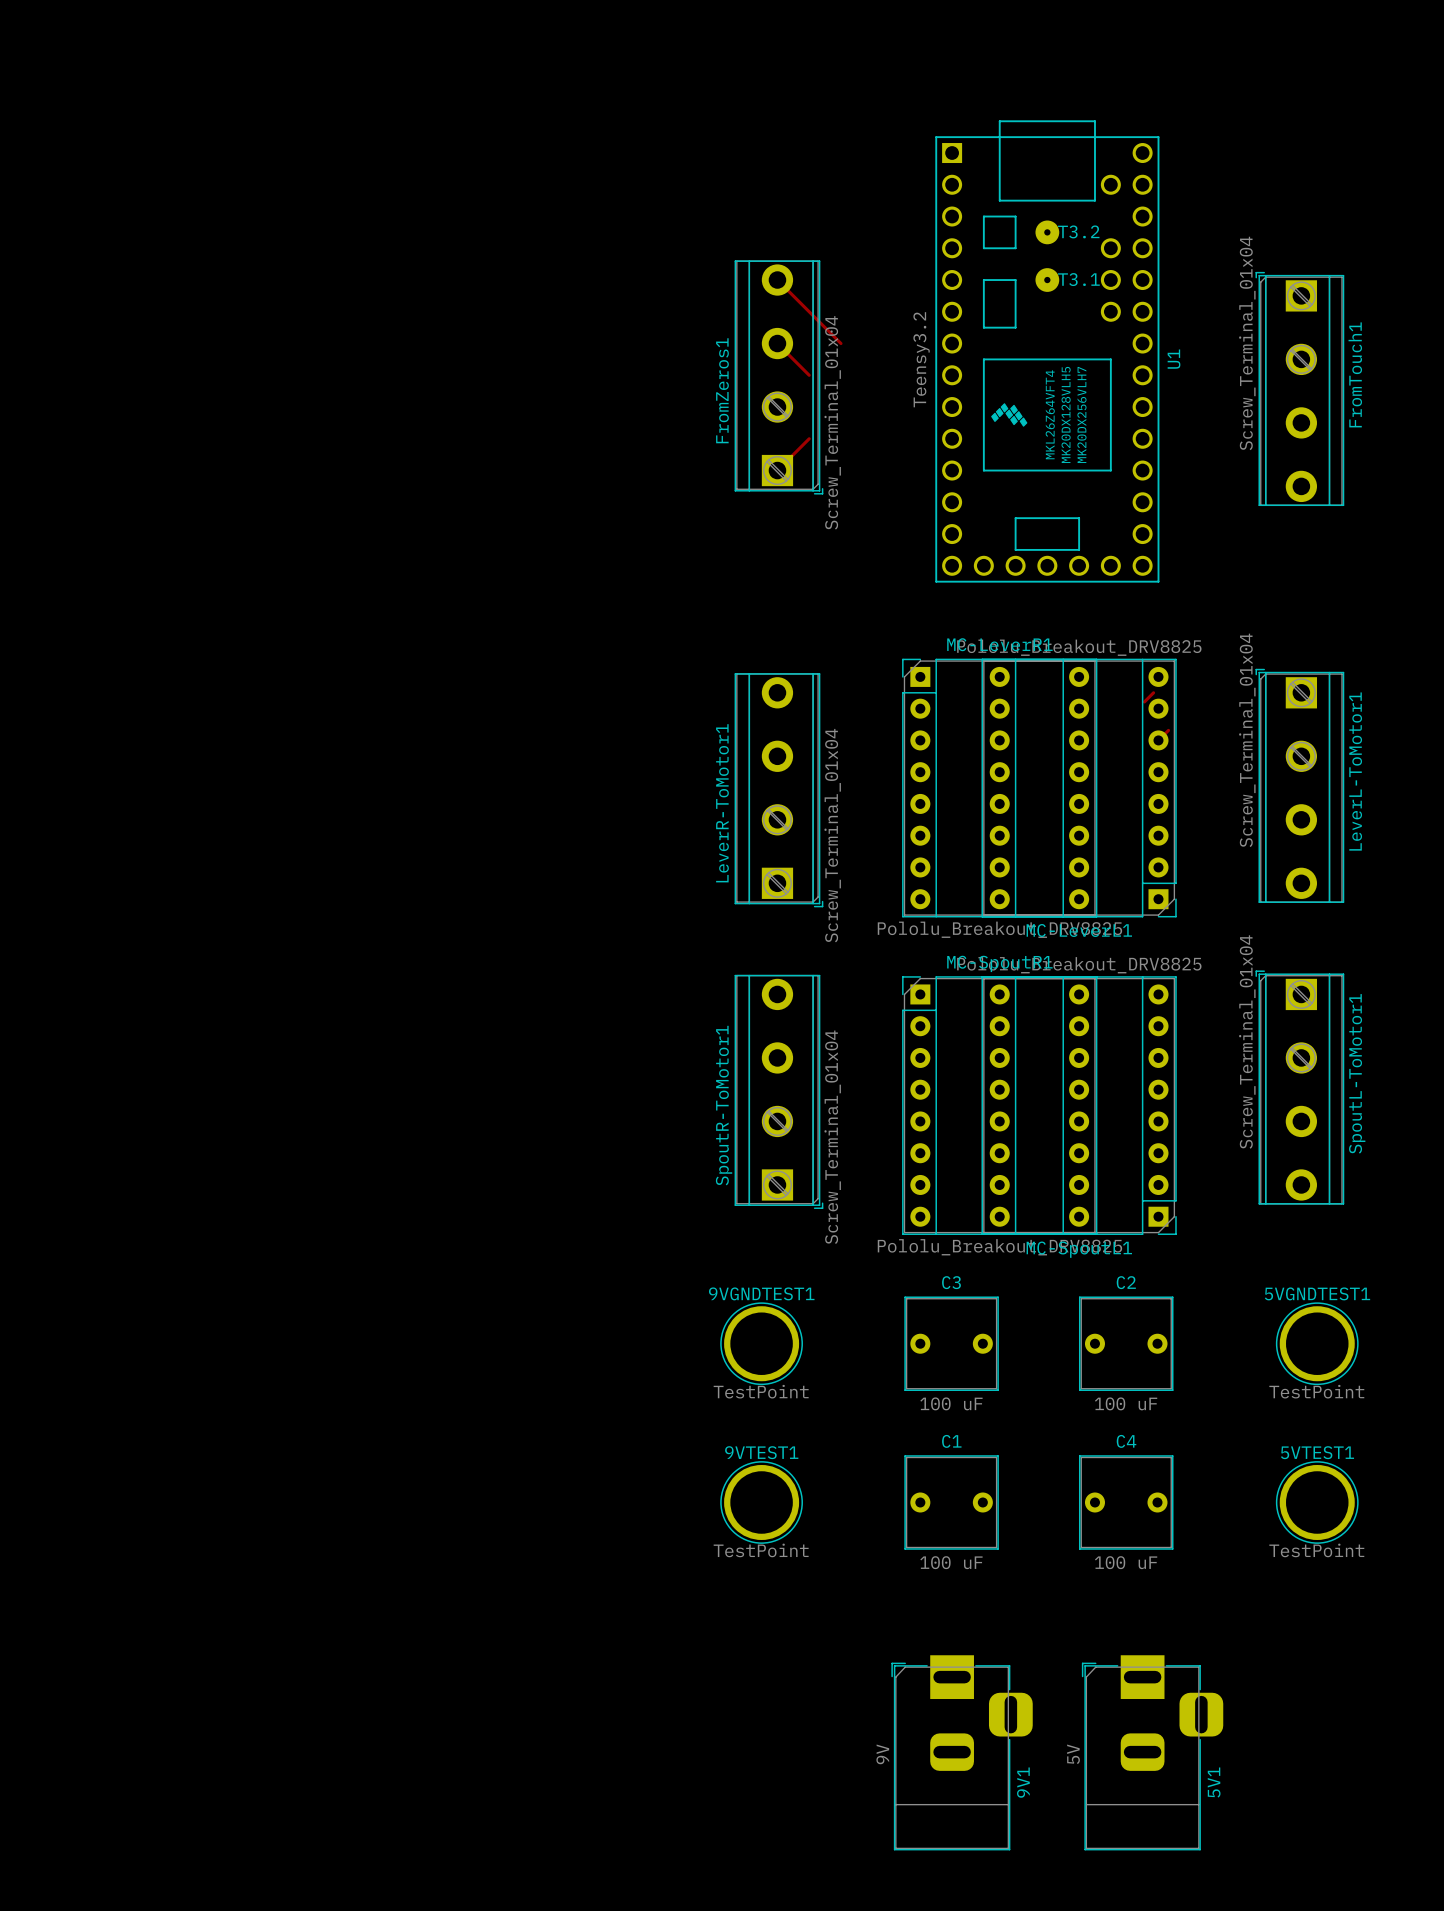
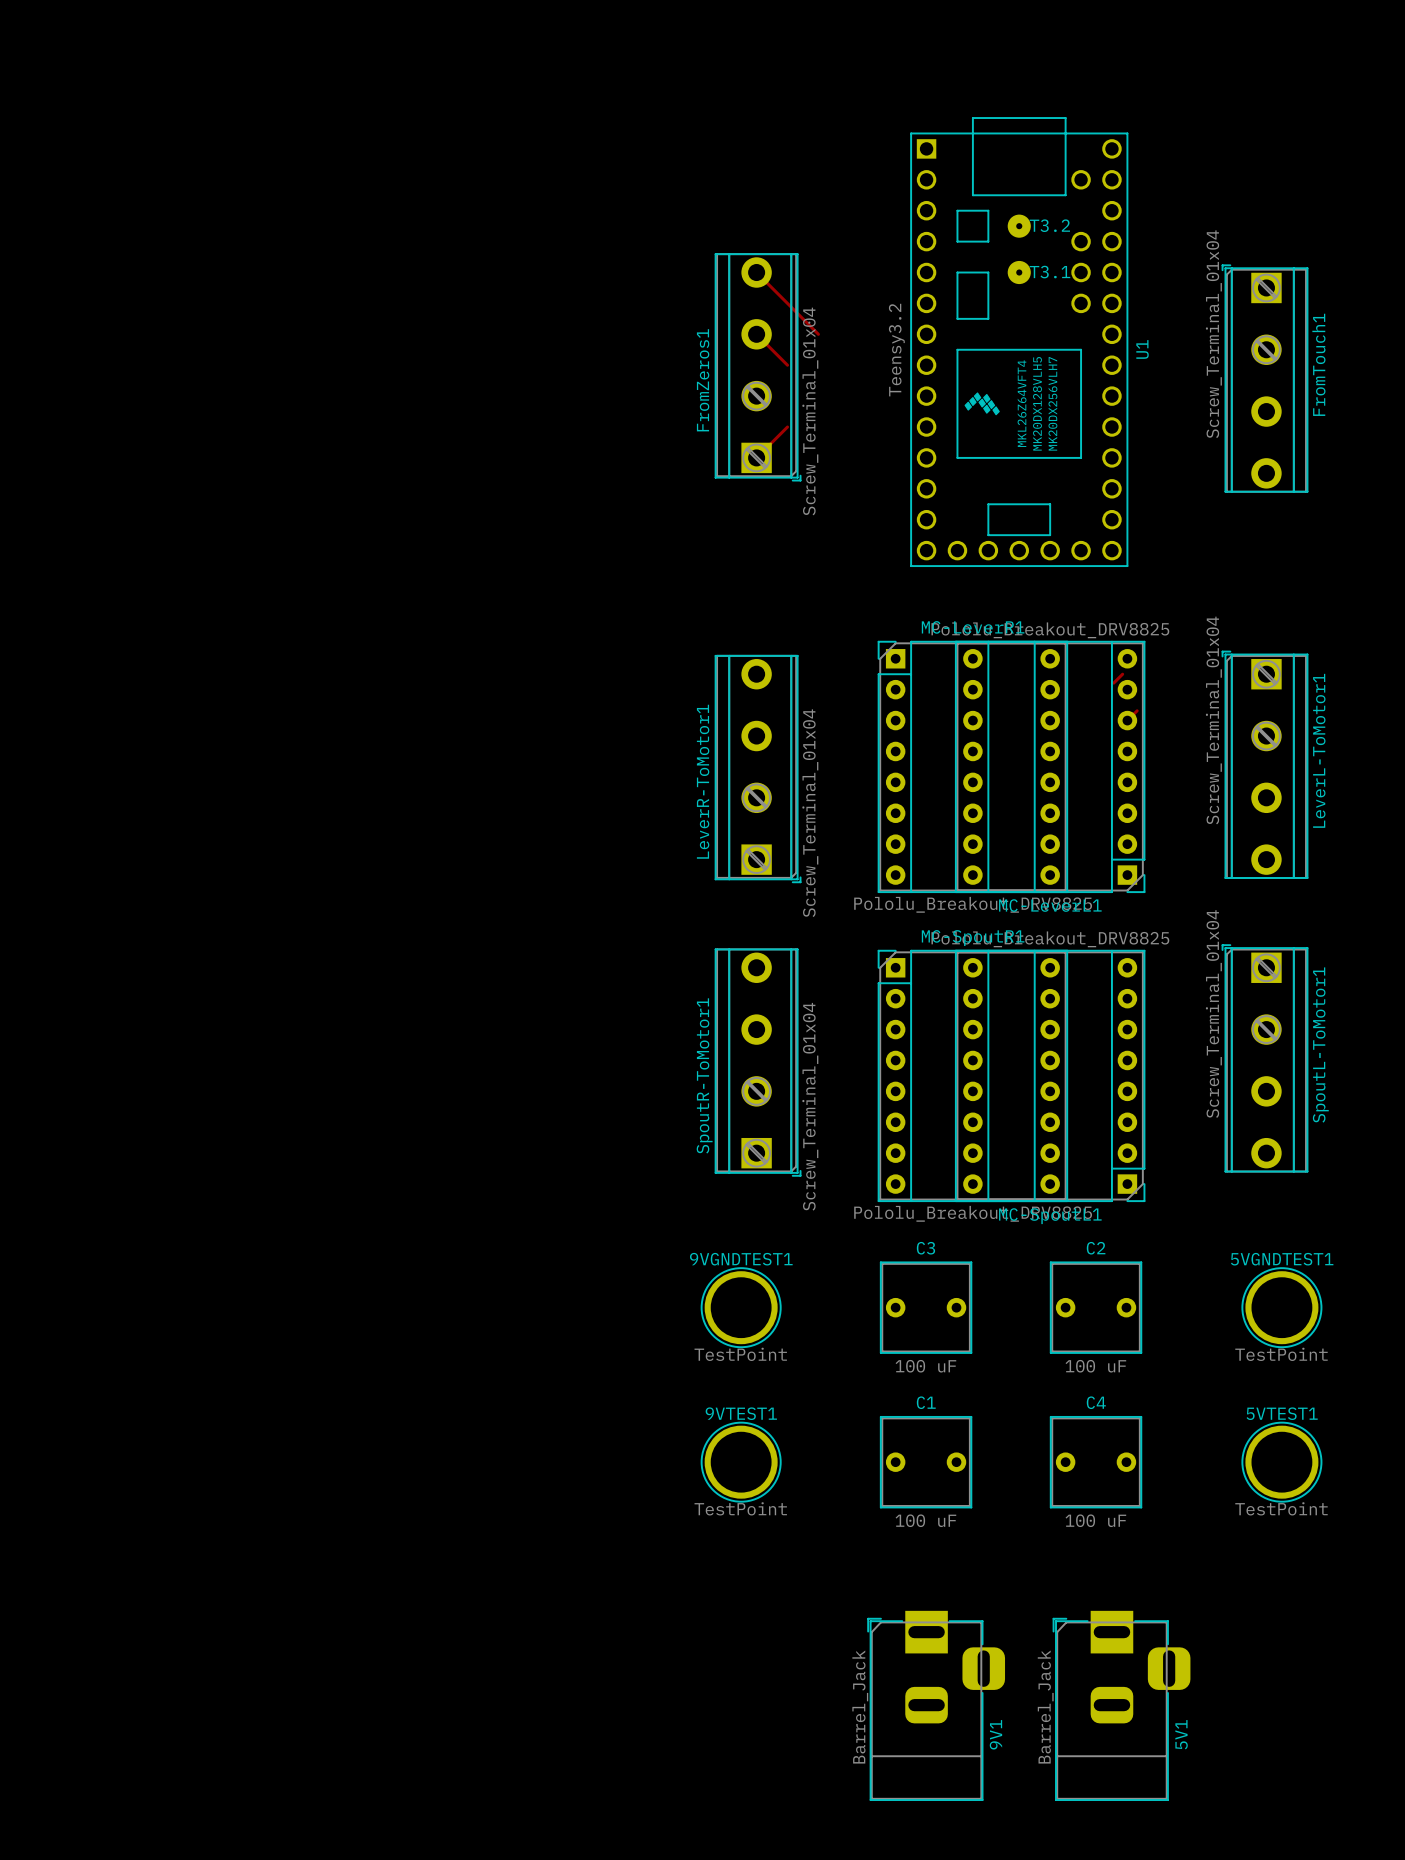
9V1 value: 9V (882, 1754) -> Barrel_Jack (860, 1707)
5V1 value: 5V (1073, 1754) -> Barrel_Jack (1045, 1707)

